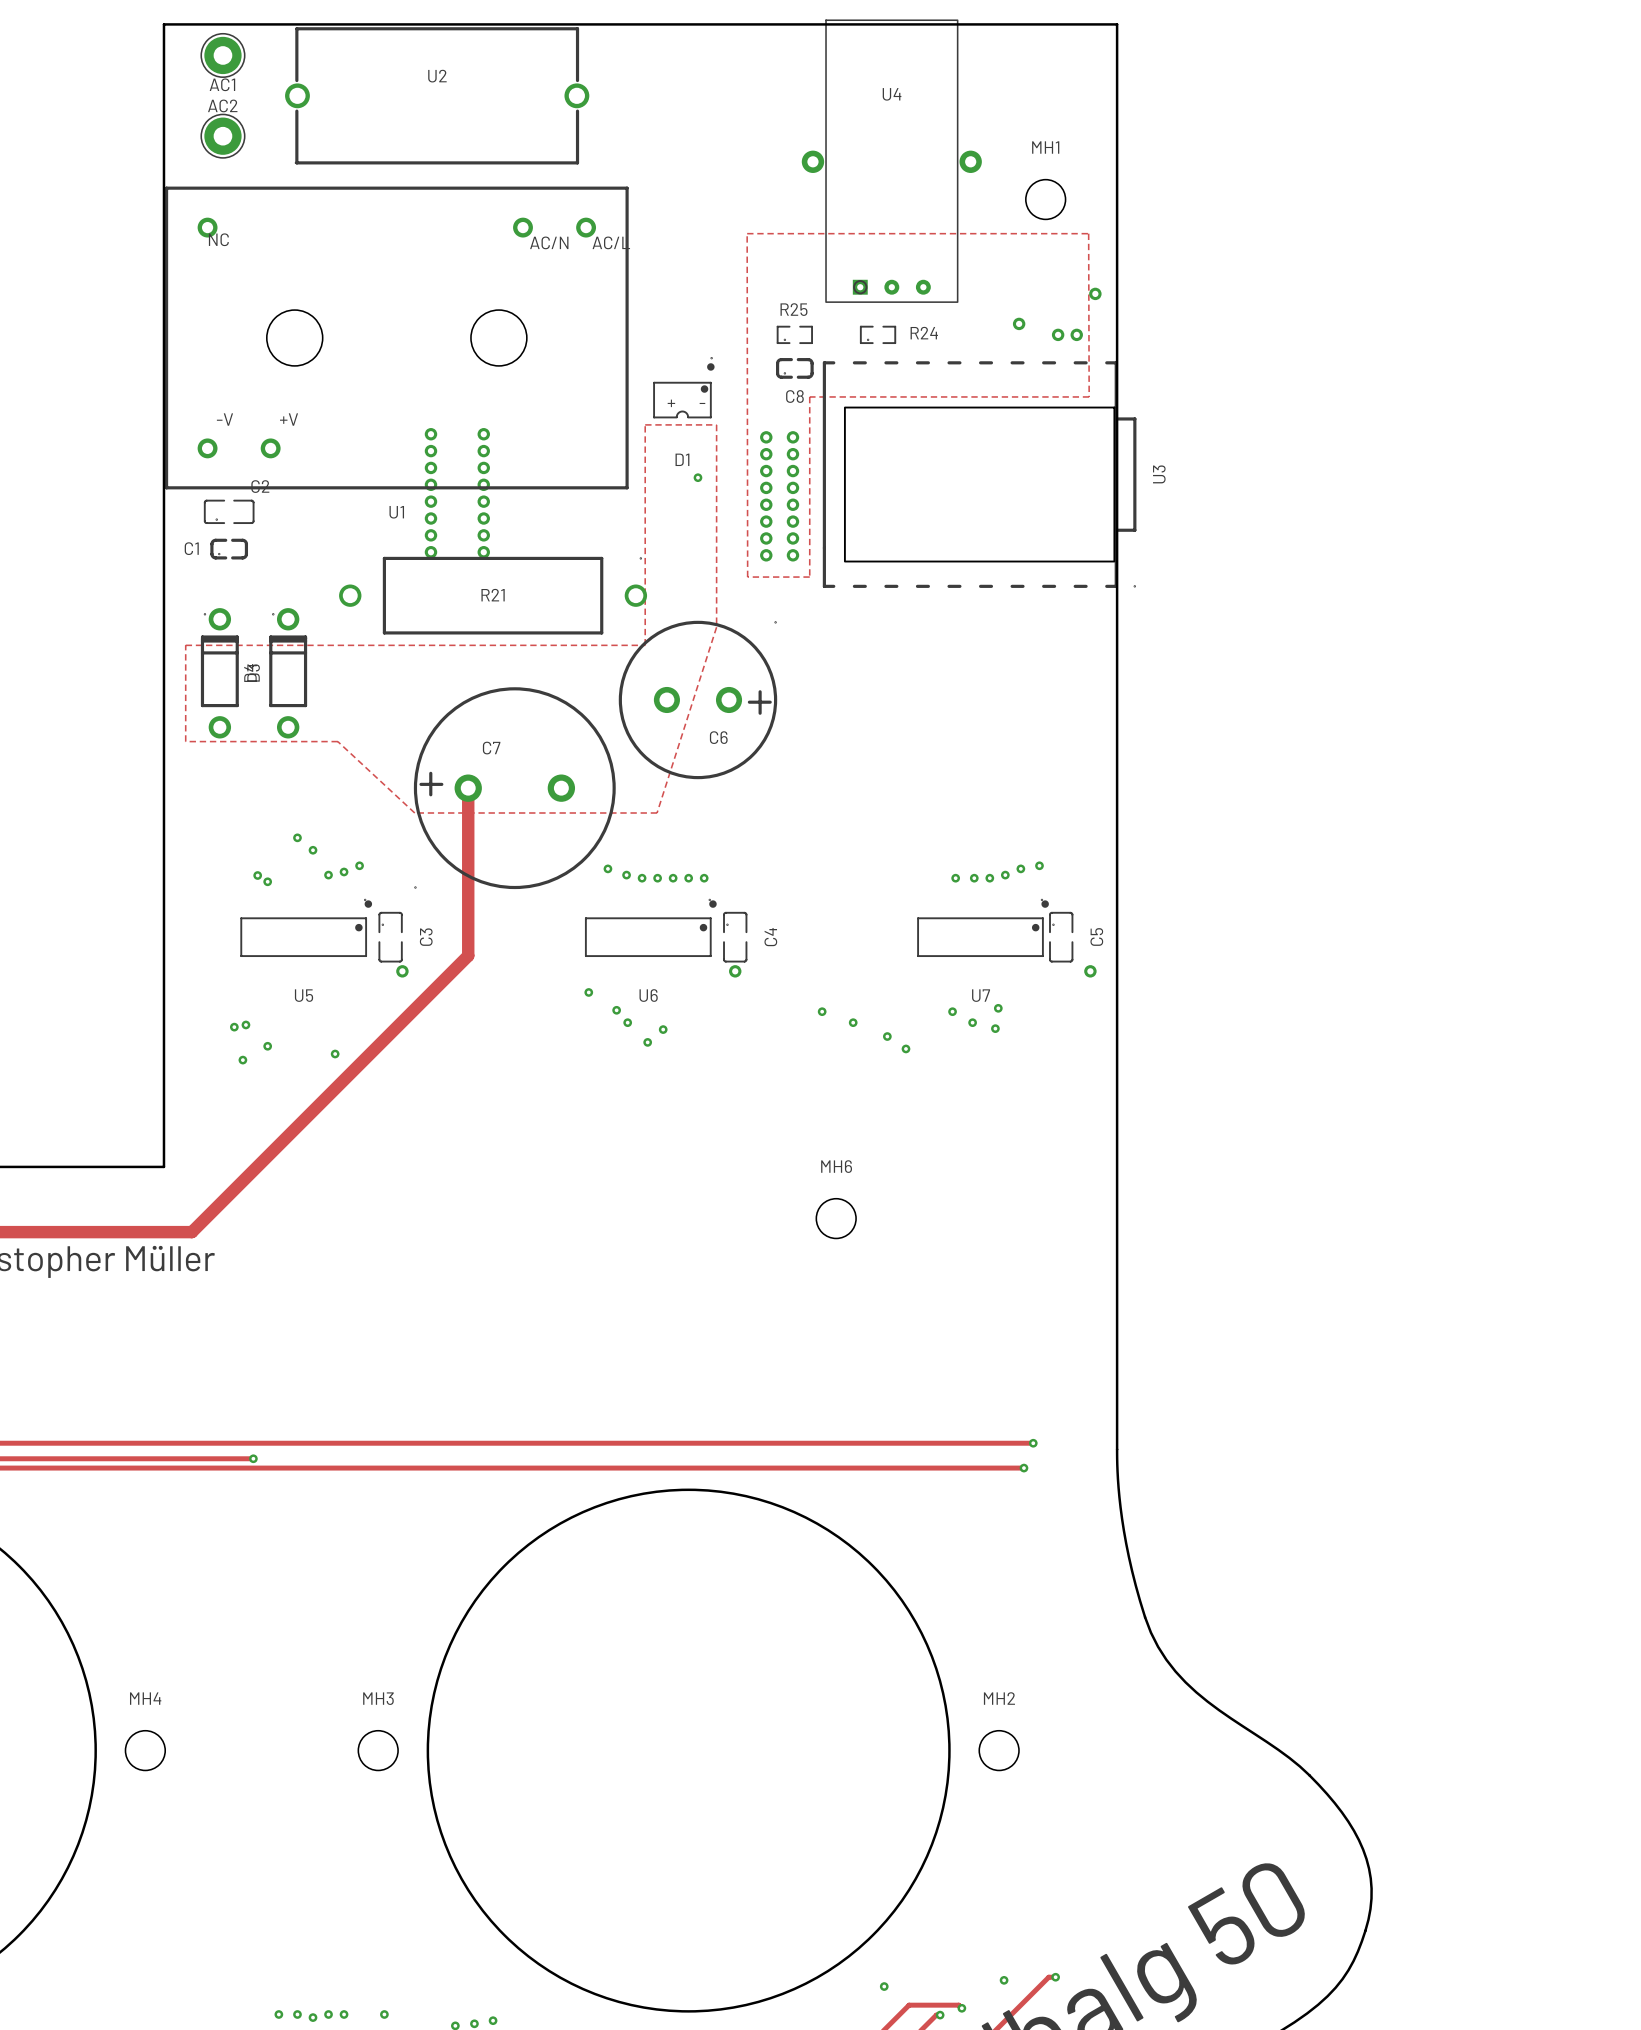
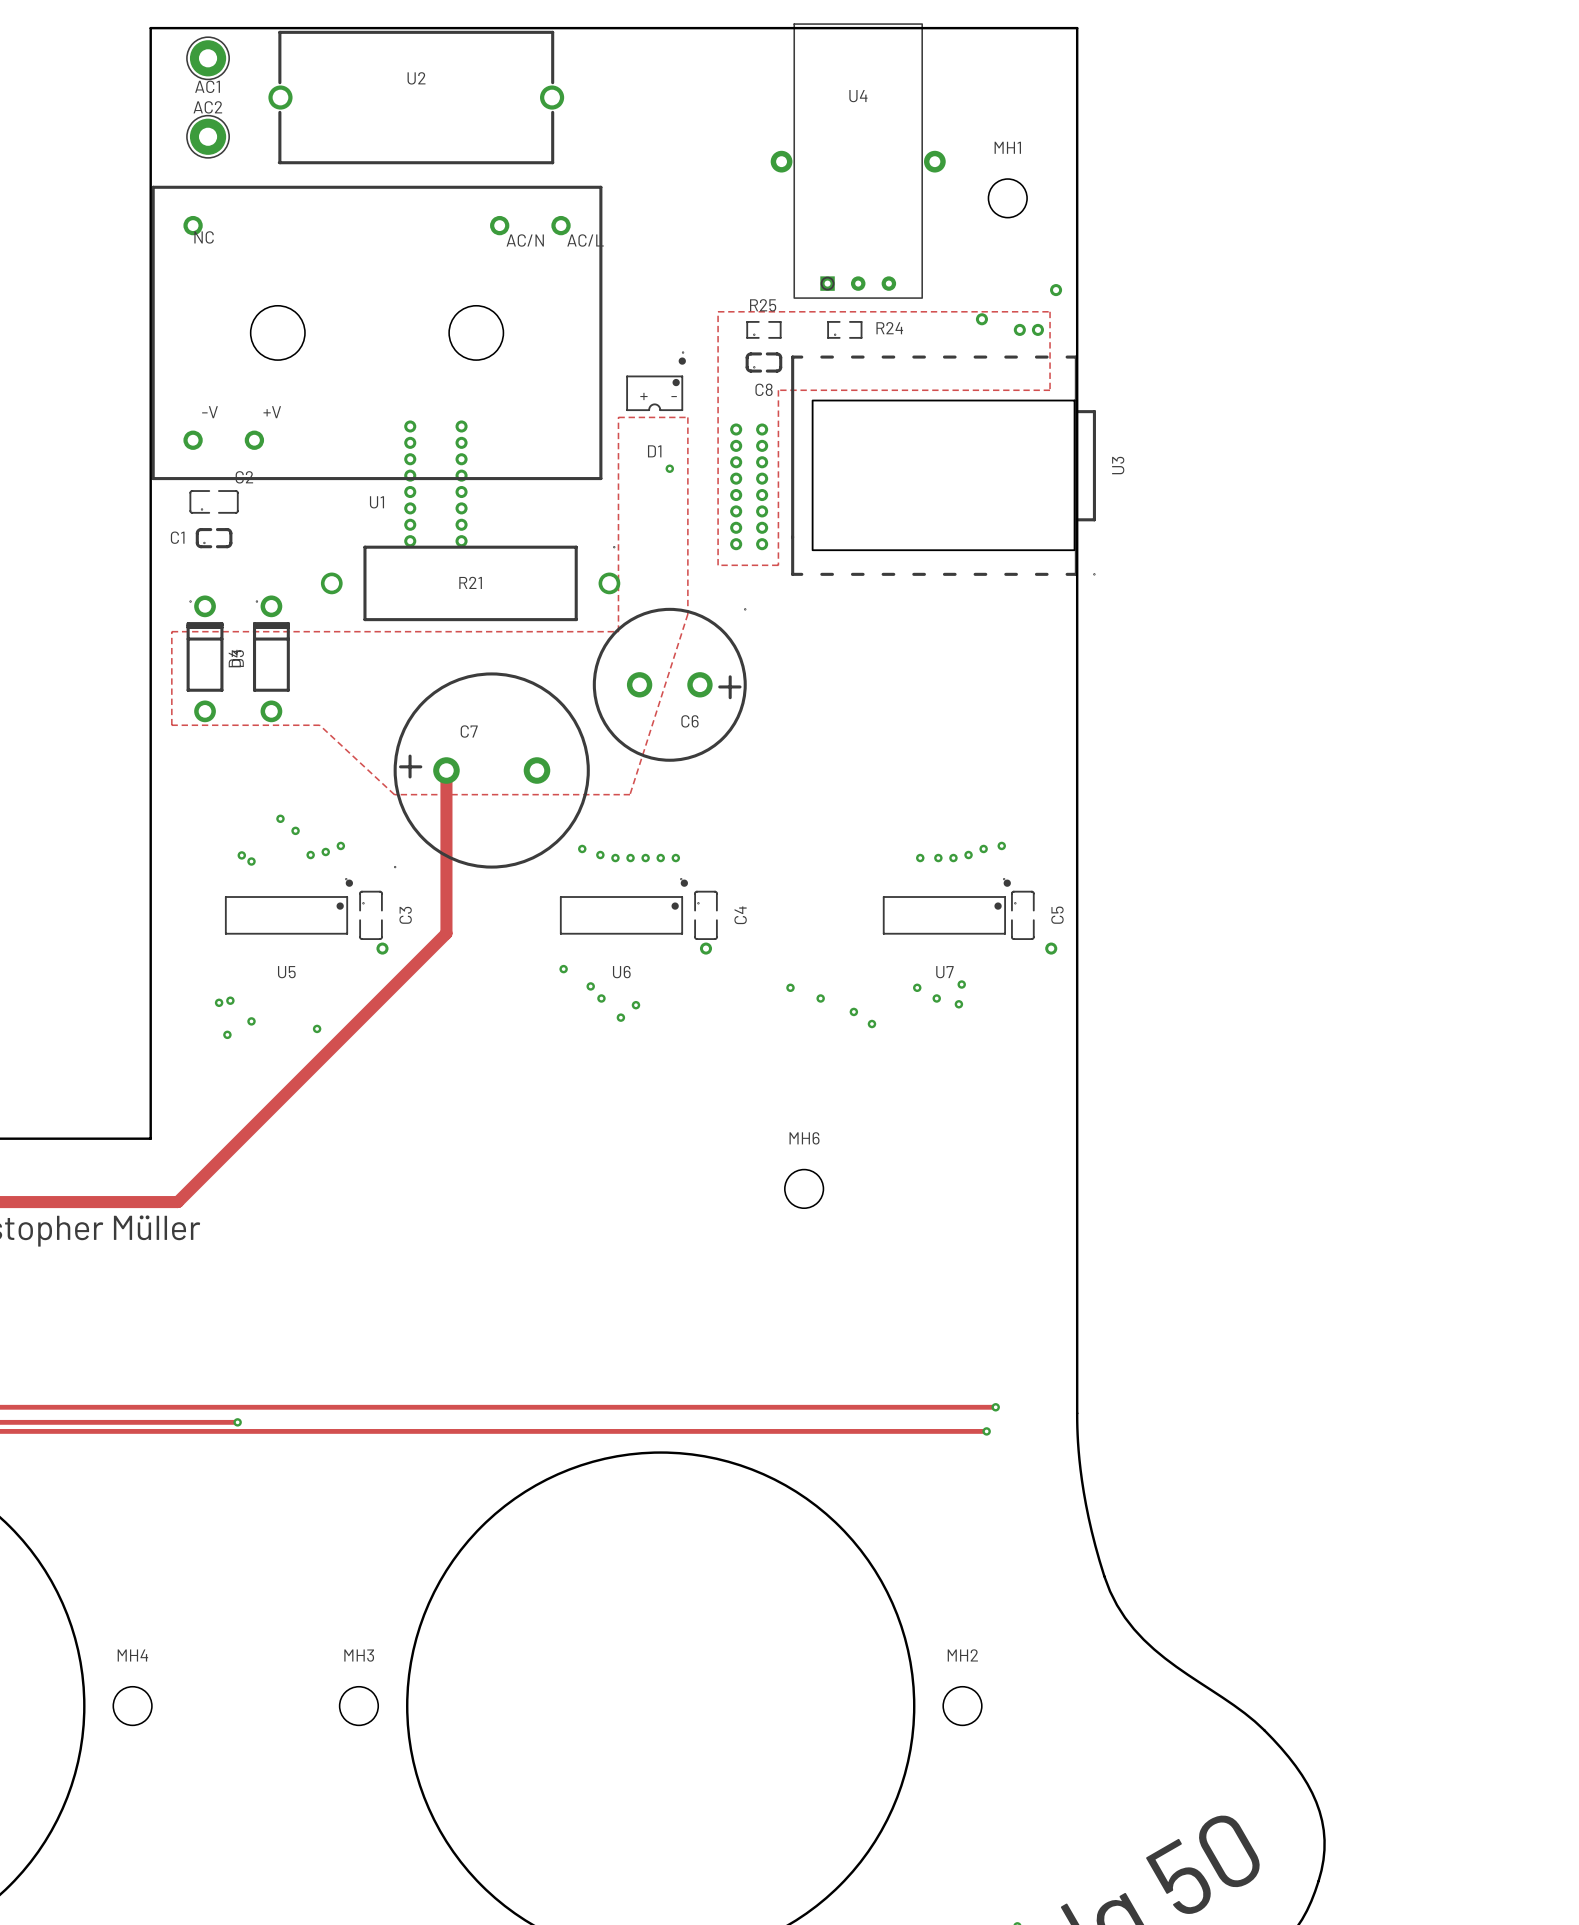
zone outline: (1089, 396) (1088, 233) (747, 233) (747, 577) -> (1050, 390) (1050, 311) (718, 311) (718, 565)

